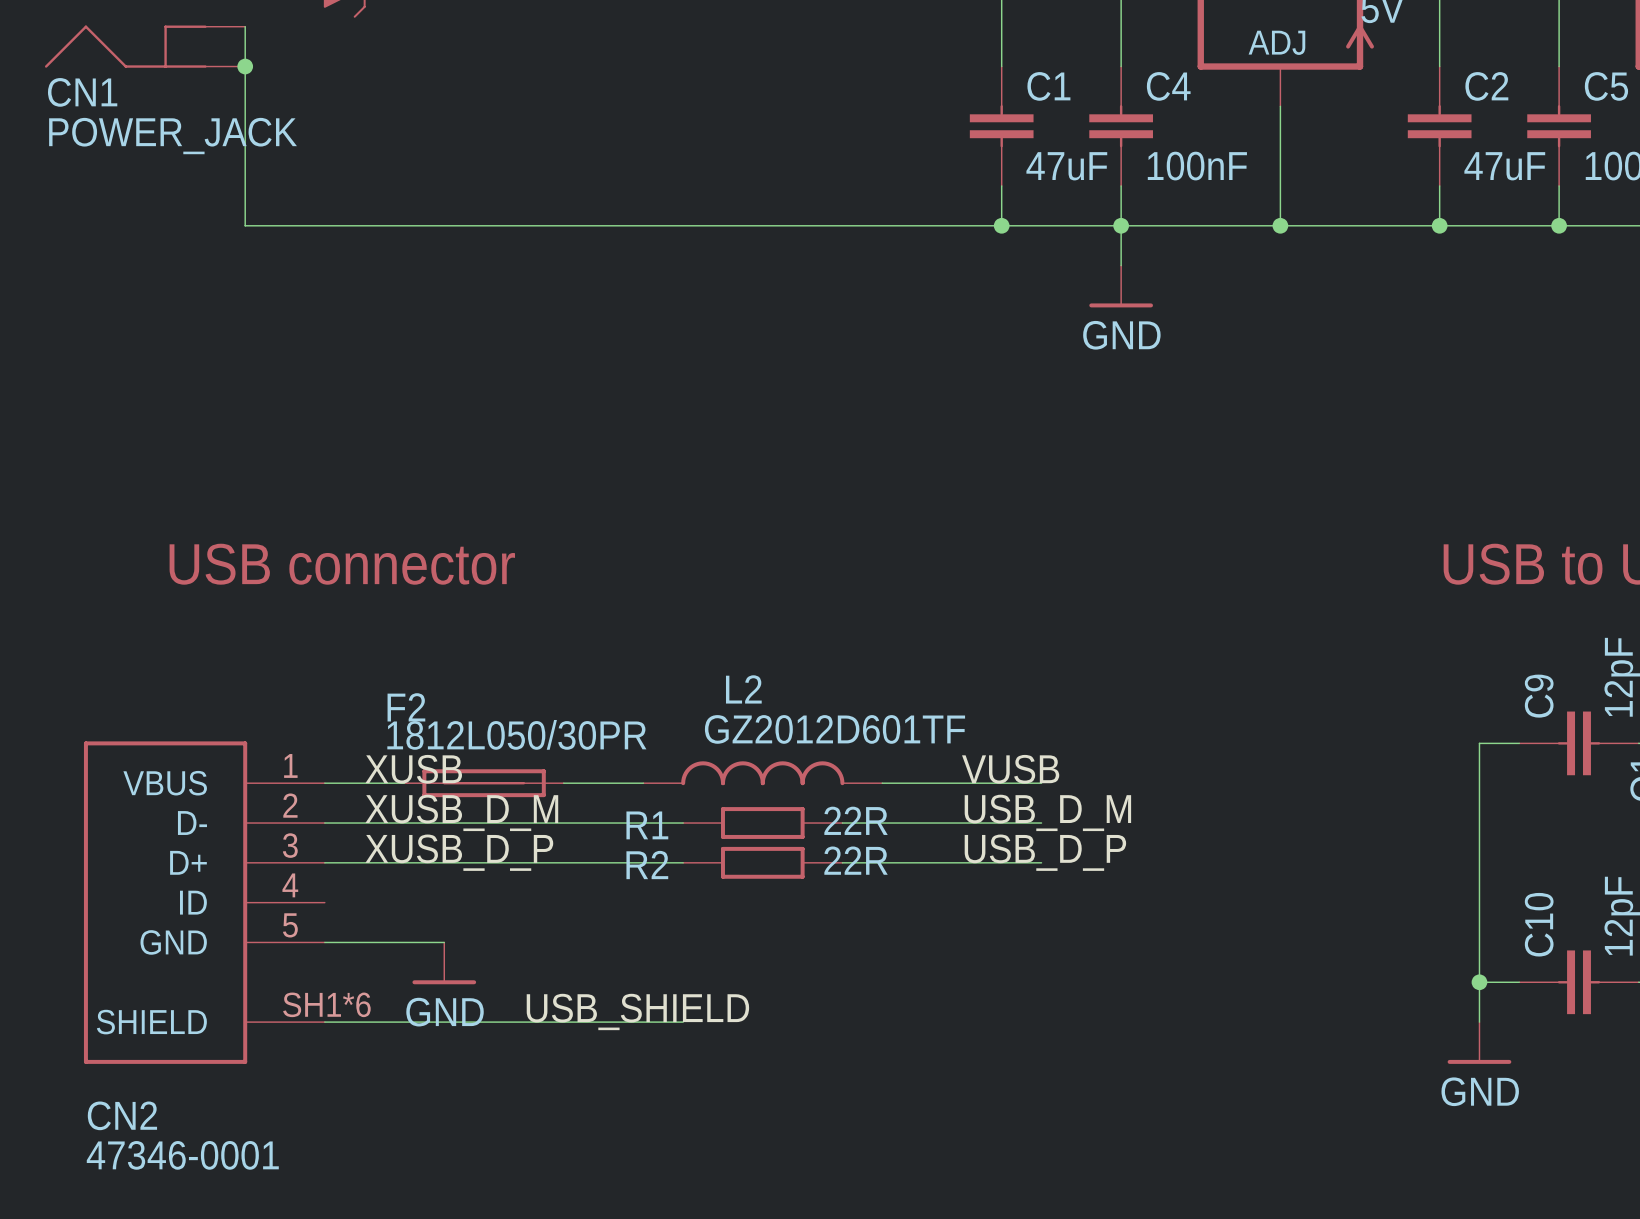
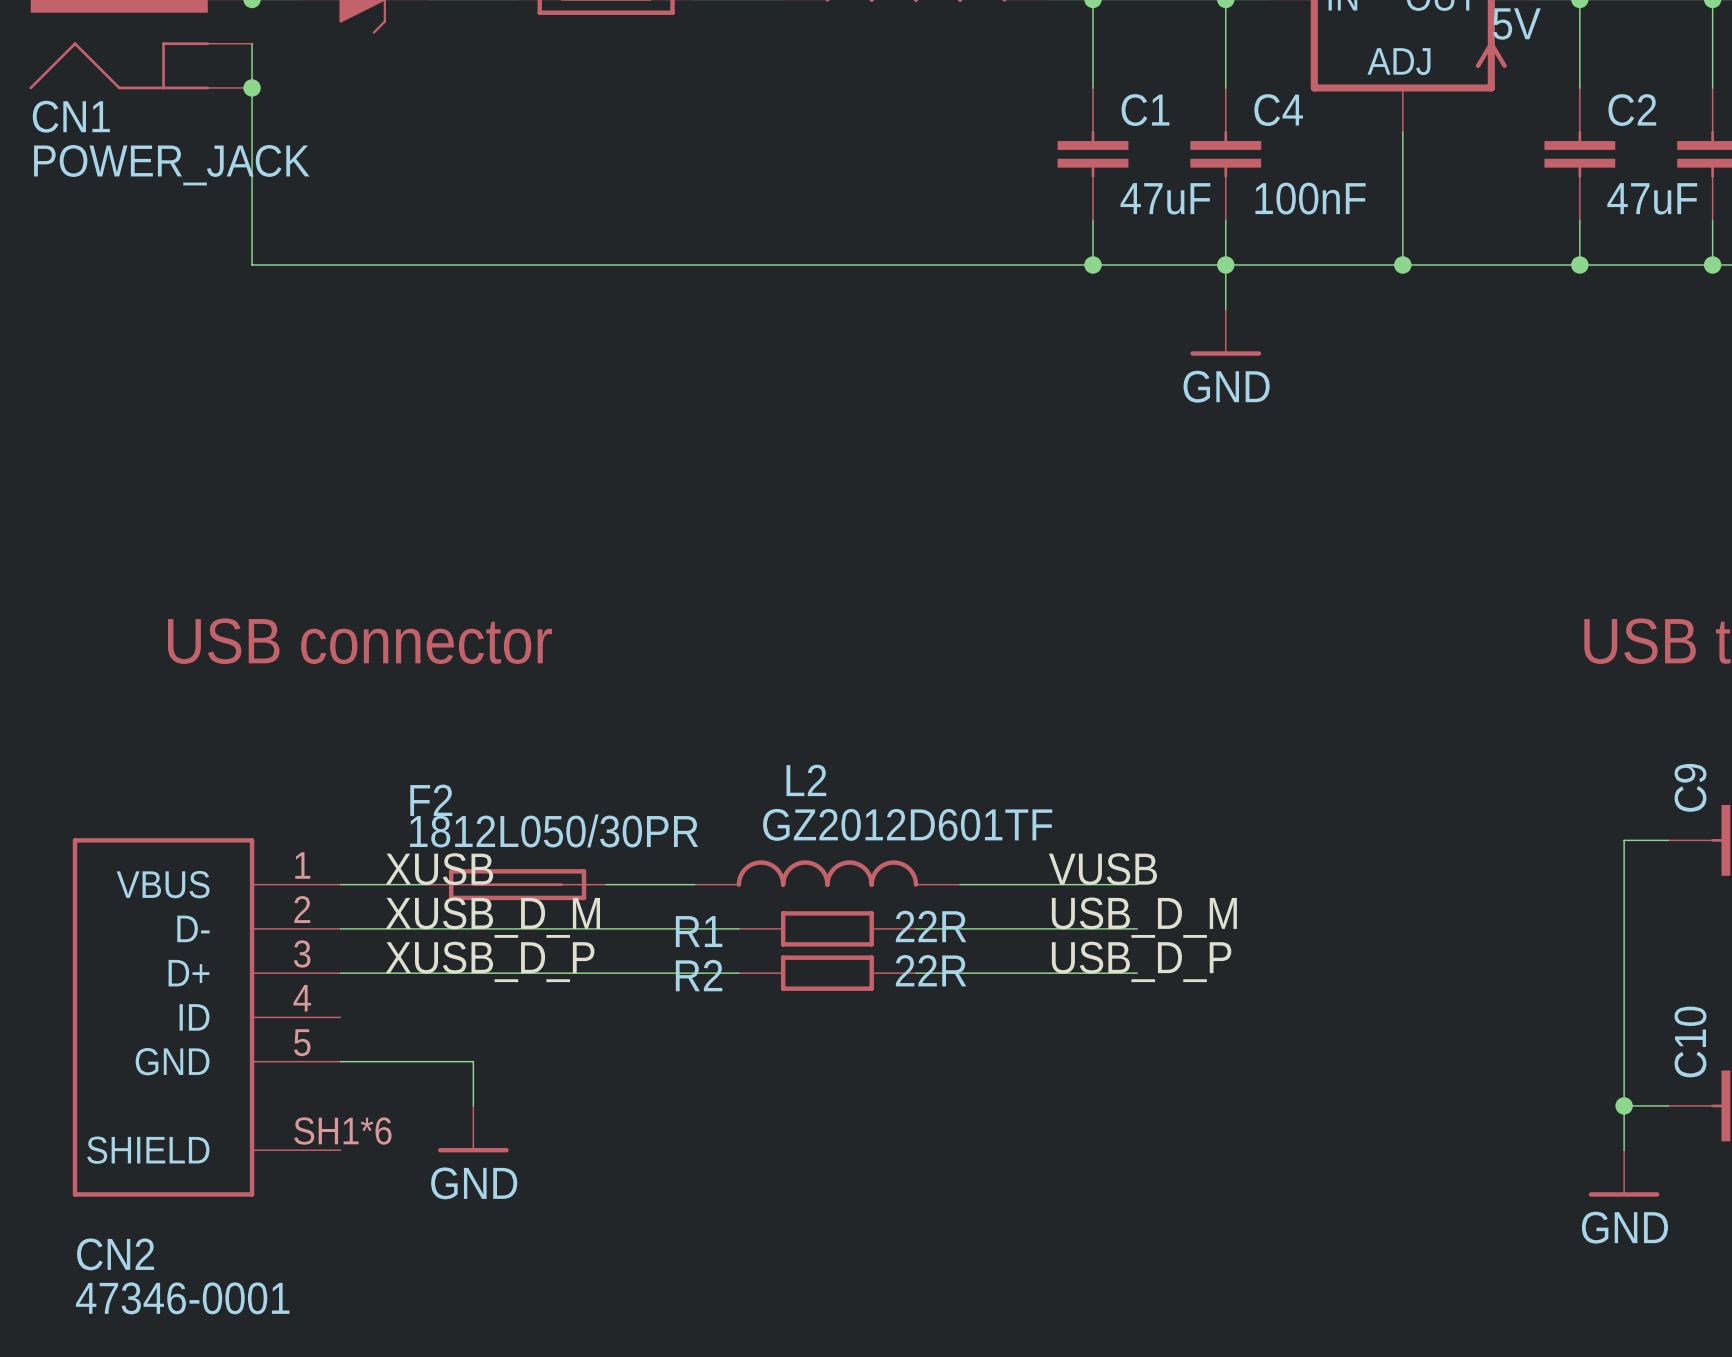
power symbol position: GND (444, 963) -> GND (473, 1129)
label: USB_SHIELD (637, 1011) -> none
wire: (324, 1022) (683, 1022) -> none

